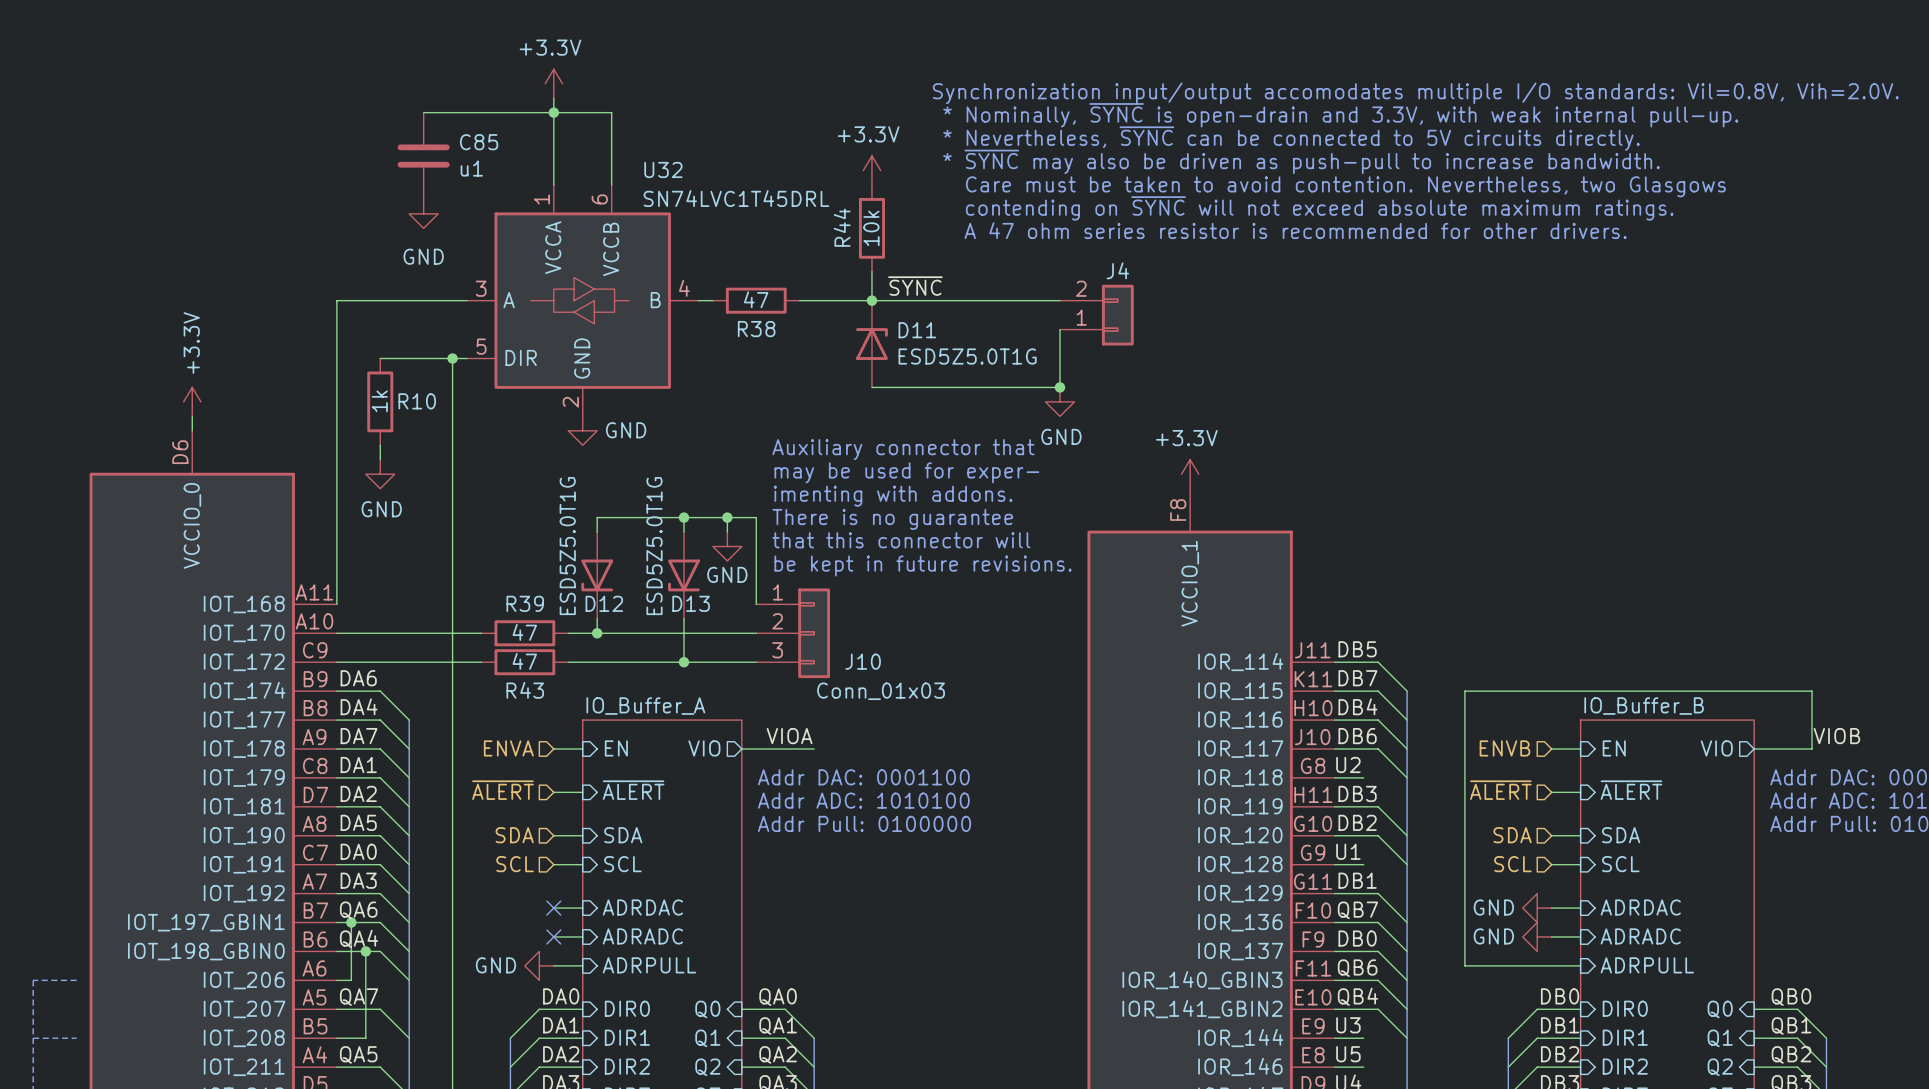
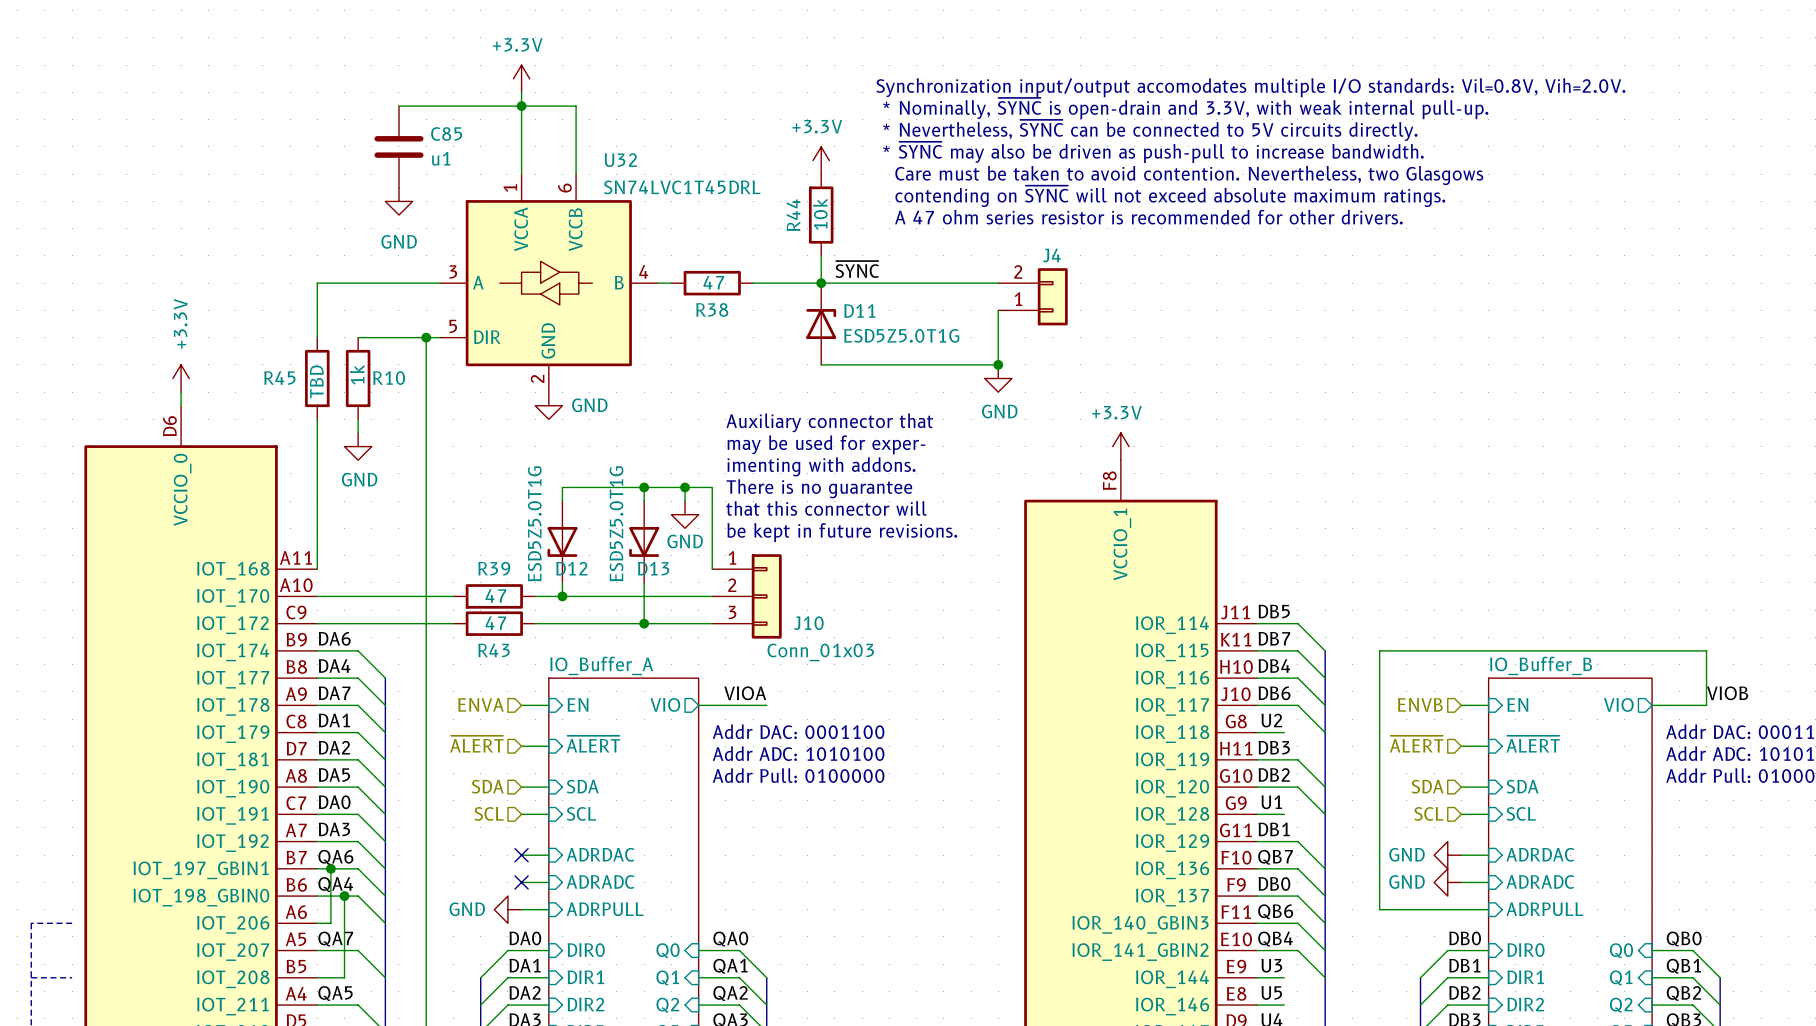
wire: (336, 358) (336, 445) -> none
R45: none -> TBD (317, 378)

